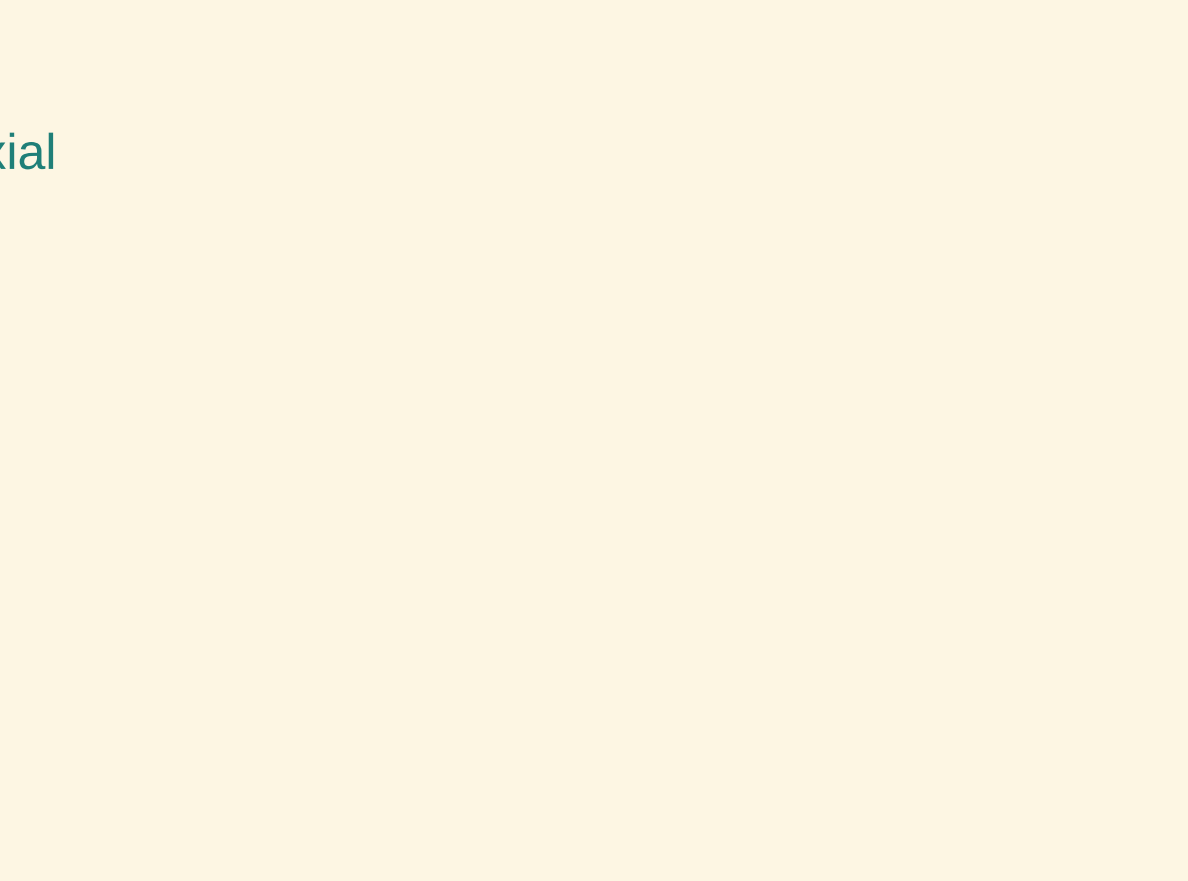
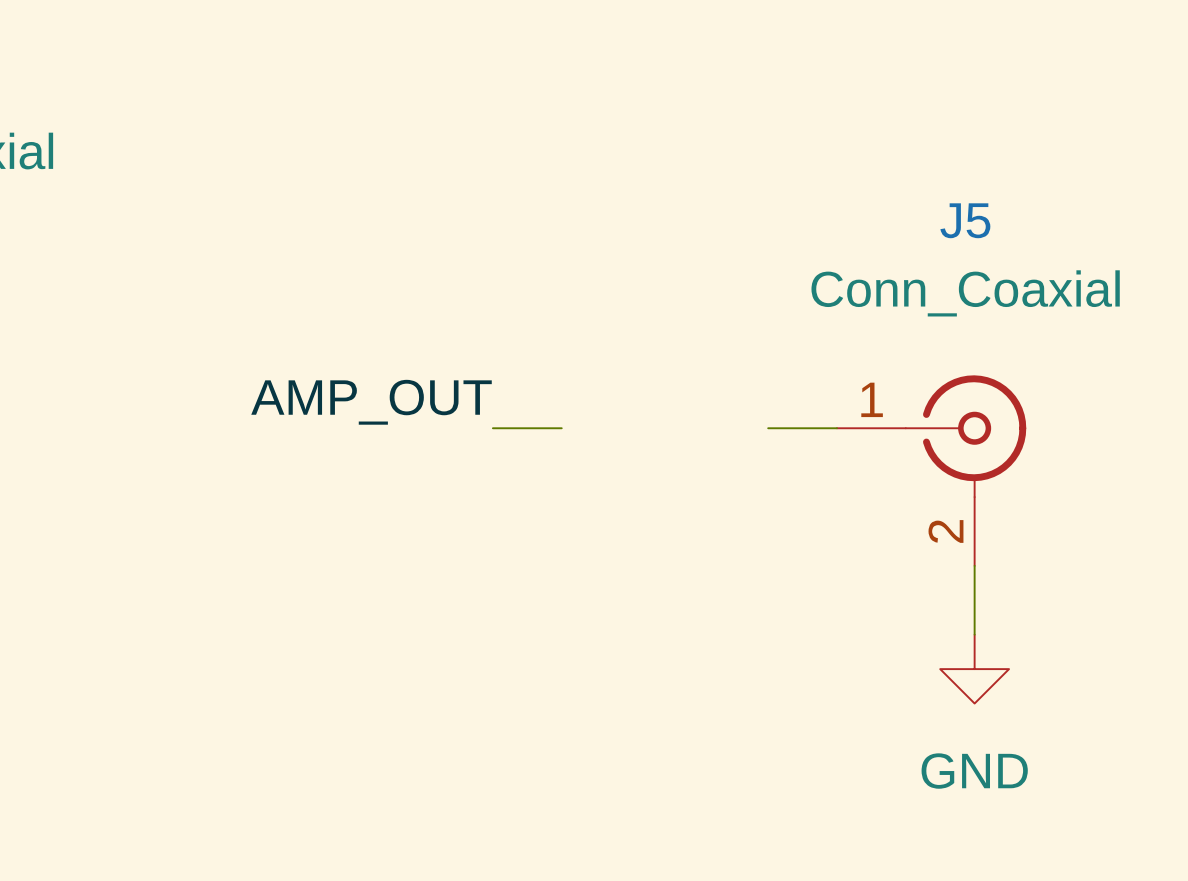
label: none -> AMP_OUT (371, 402)
wire: none -> (492, 428) (561, 428)
wire: none -> (768, 428) (836, 428)
J5: none -> Conn_Coaxial (931, 470)
wire: none -> (974, 565) (974, 634)
power symbol: none -> GND (974, 669)

